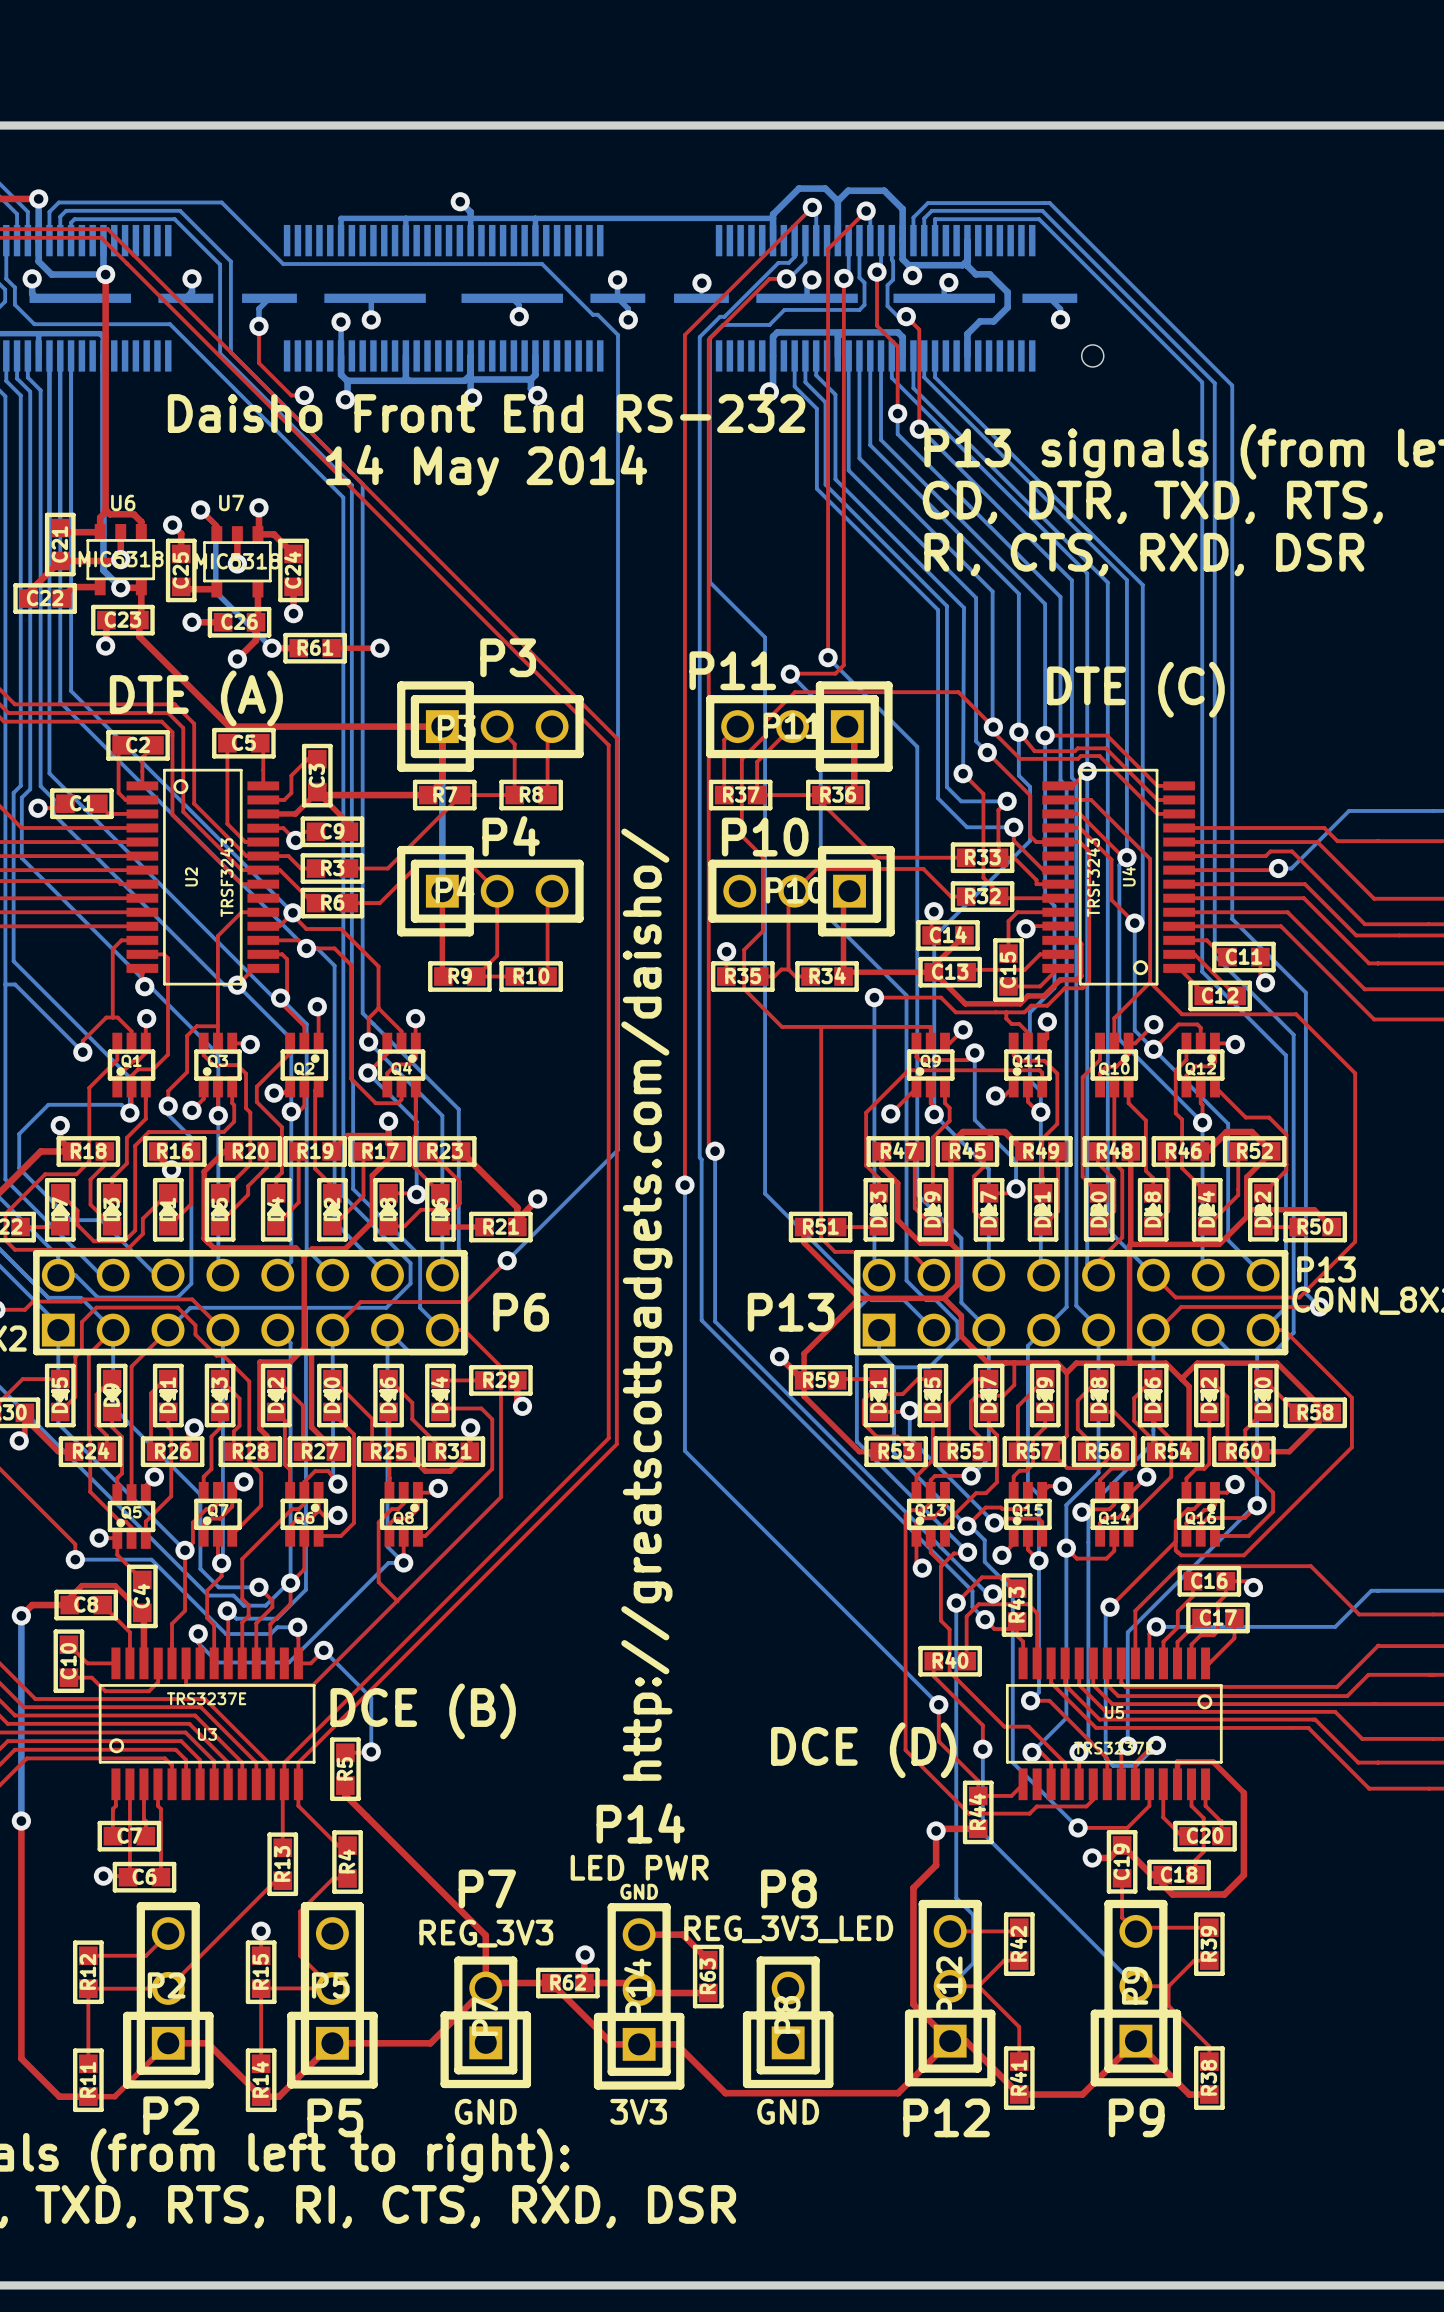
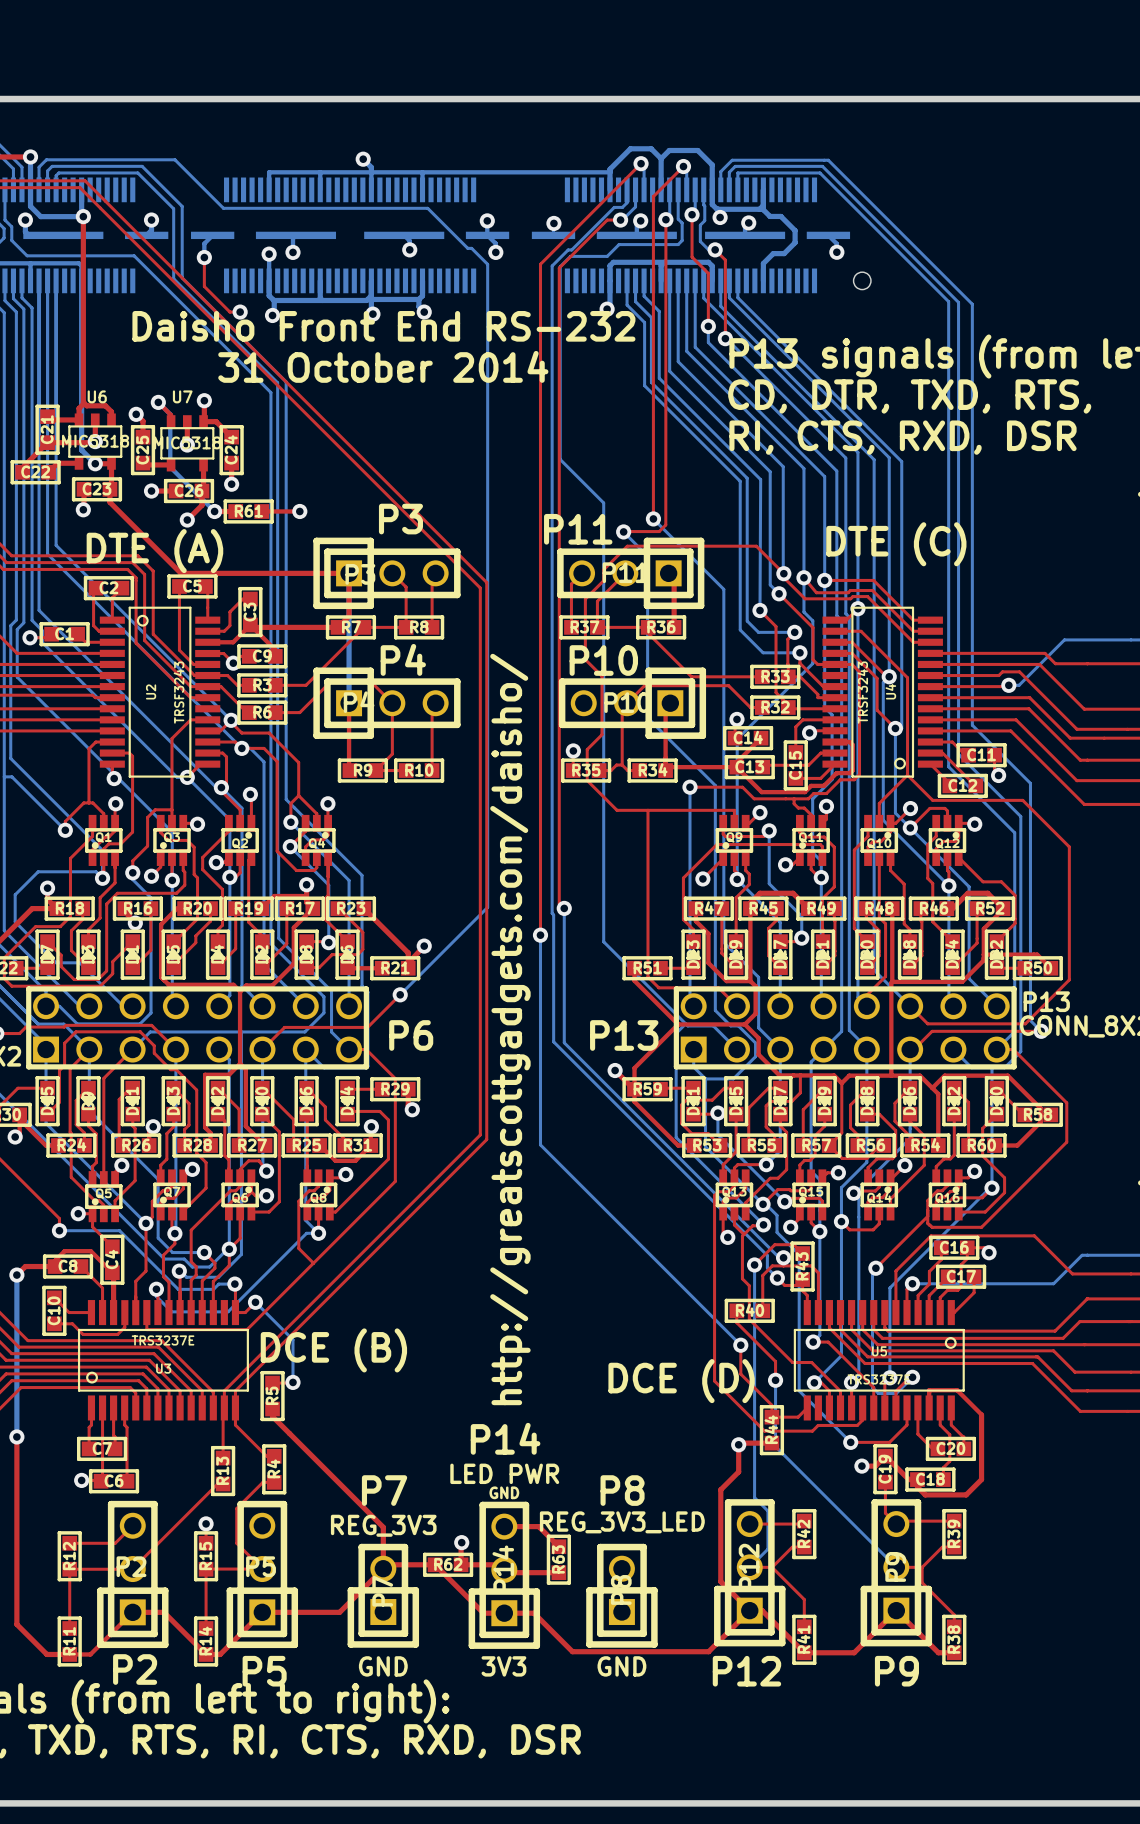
text: 14 May 2014 (486, 470) -> 31 October 2014 (383, 366)

